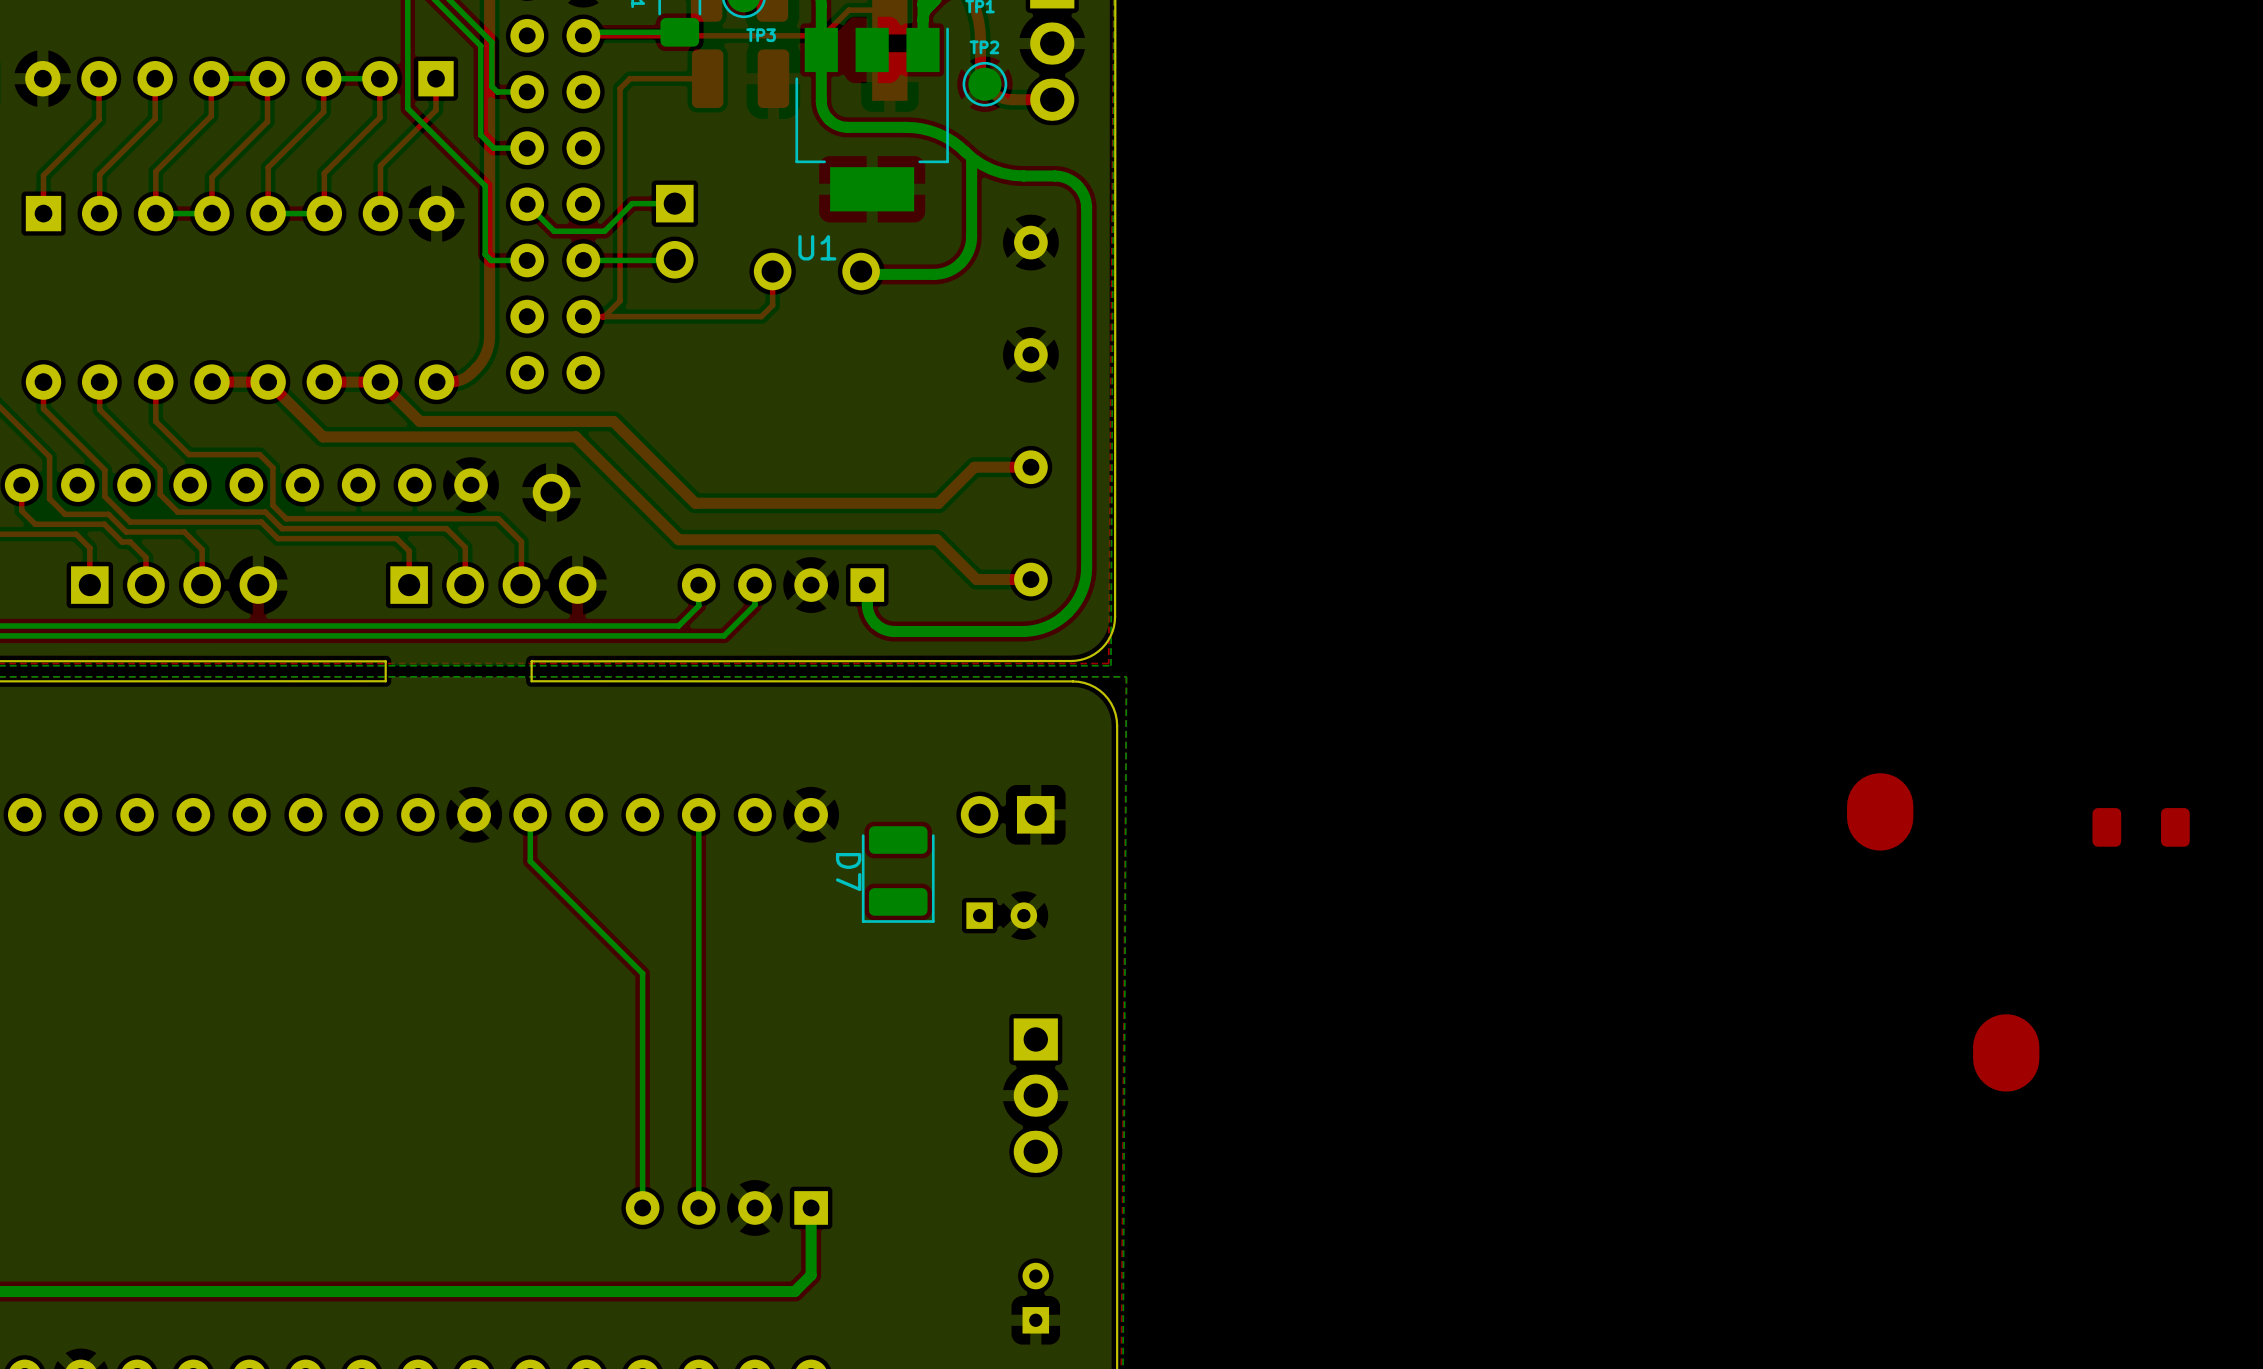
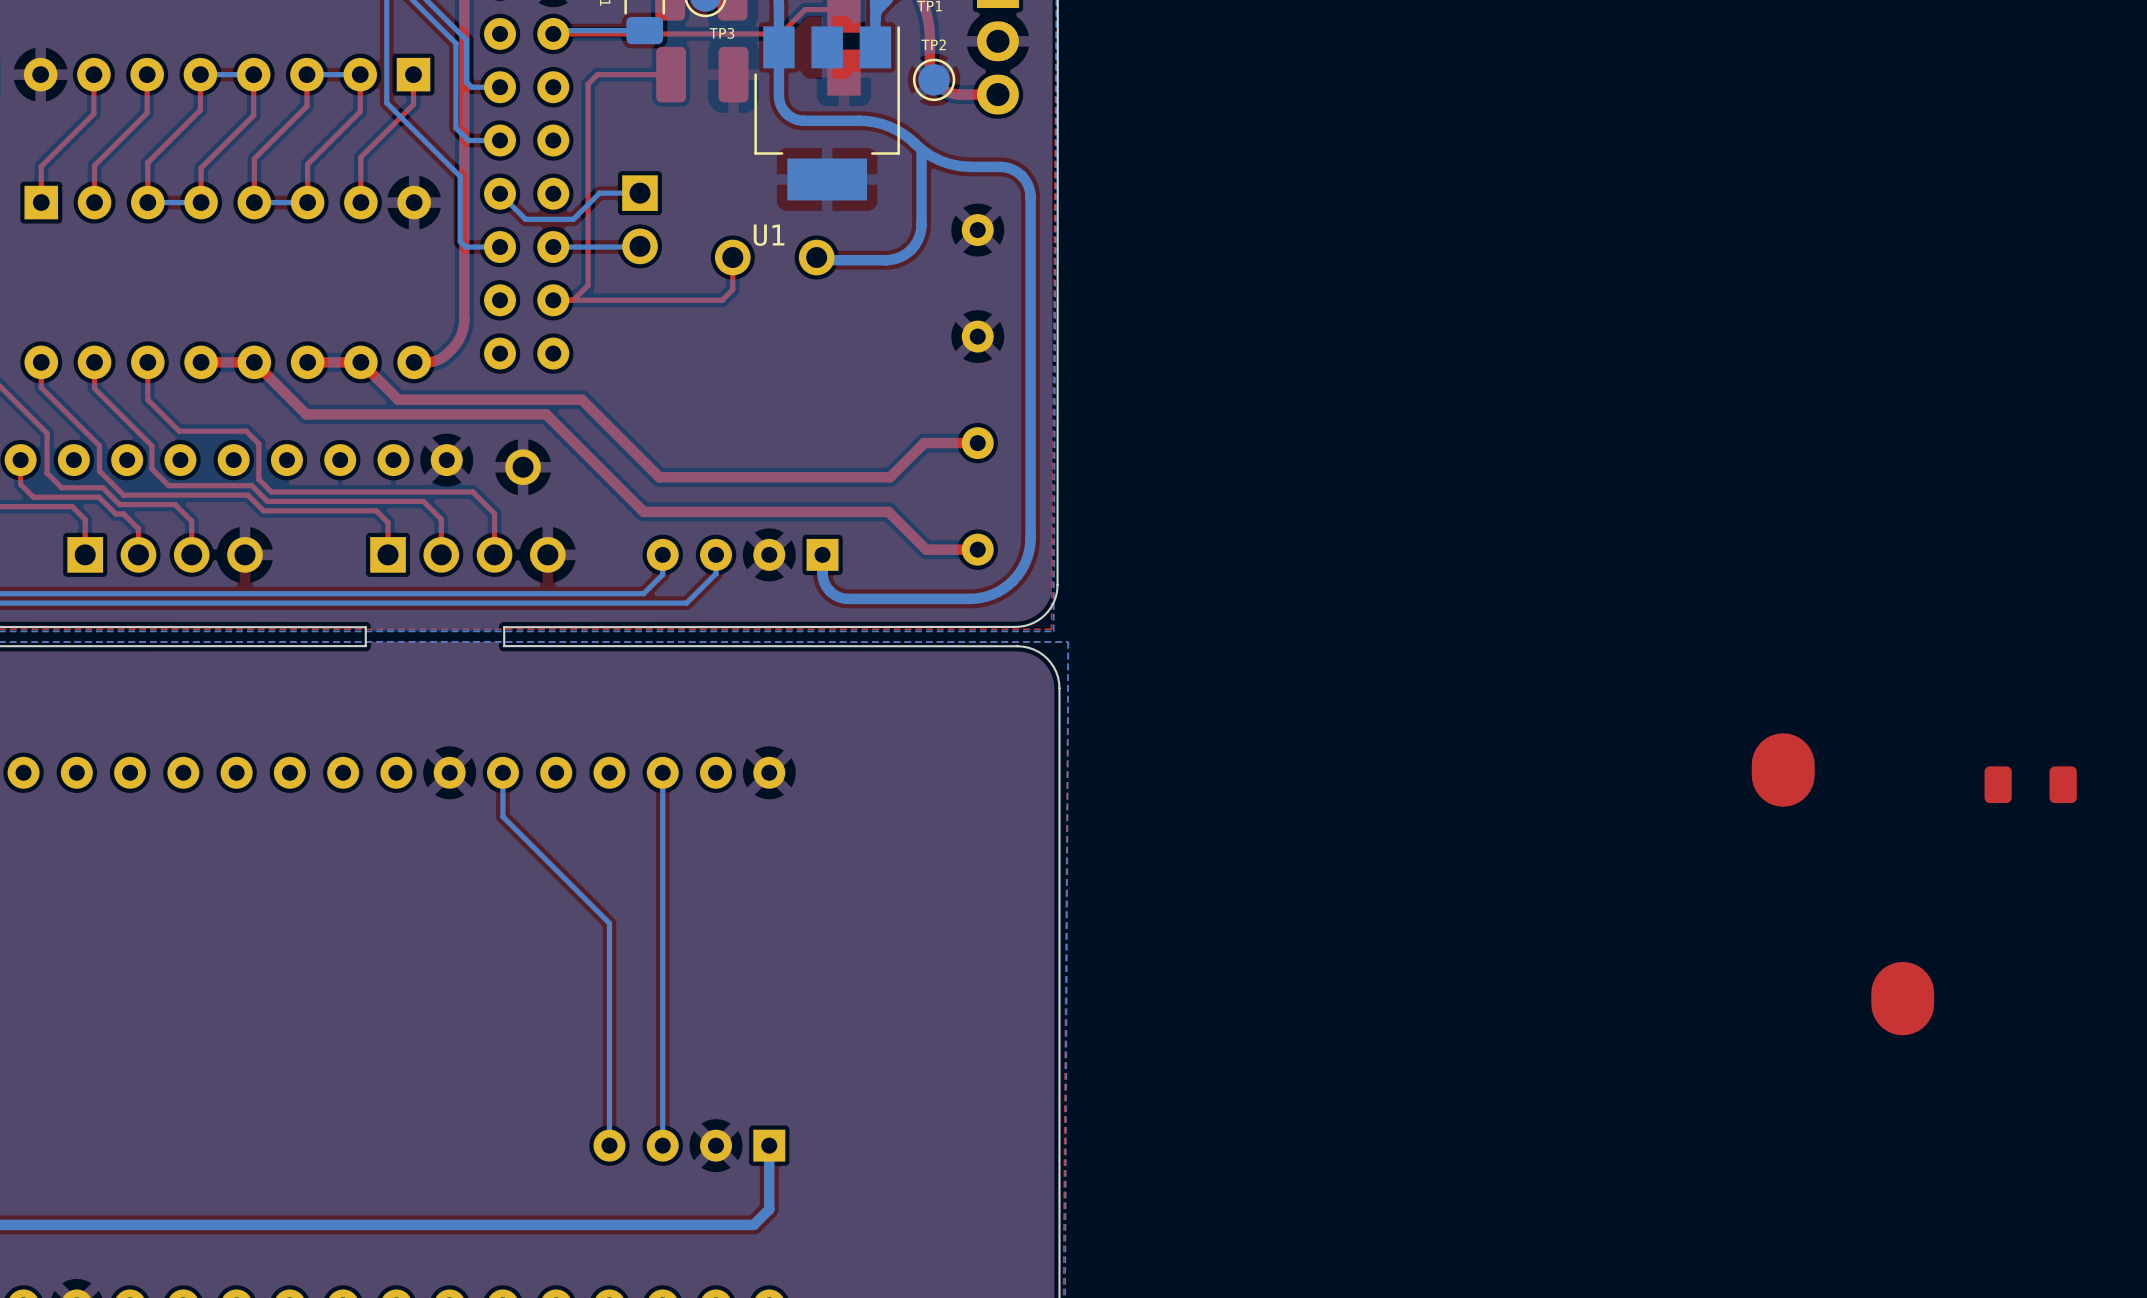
part: (1007, 814) -> none
D7: (898, 874) -> none
part: (1001, 915) -> none
part: (1035, 1095) -> none
part: (1035, 1298) -> none

